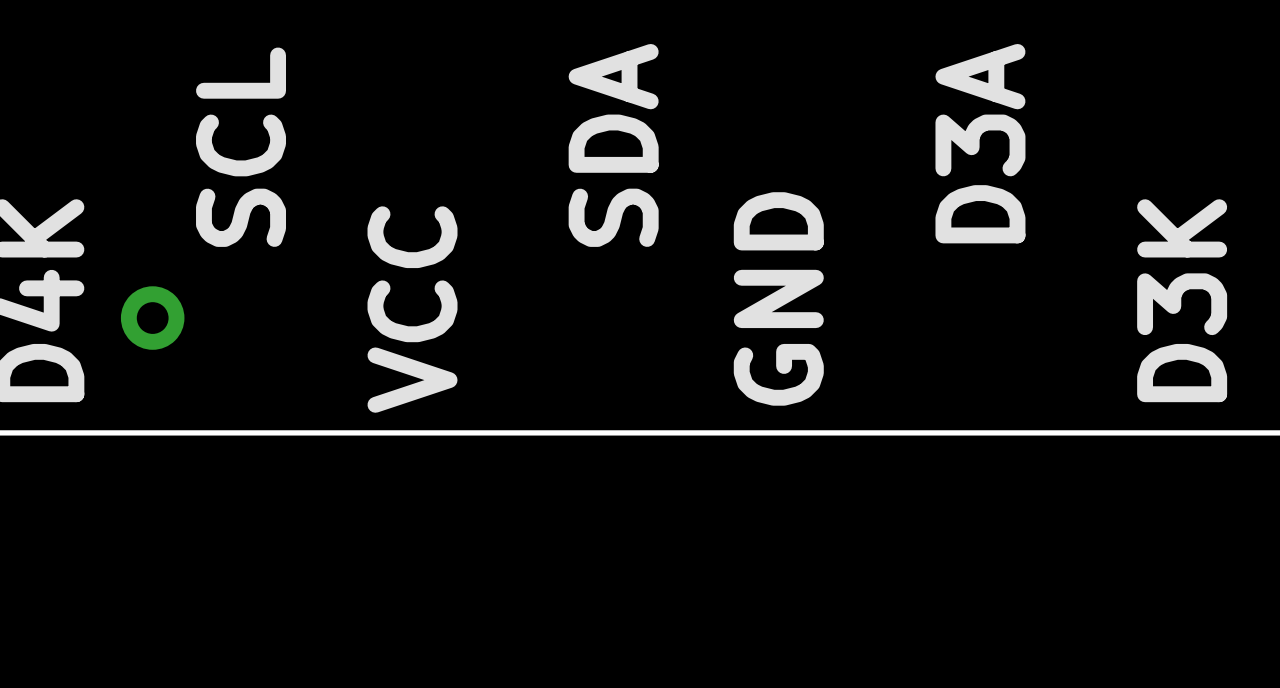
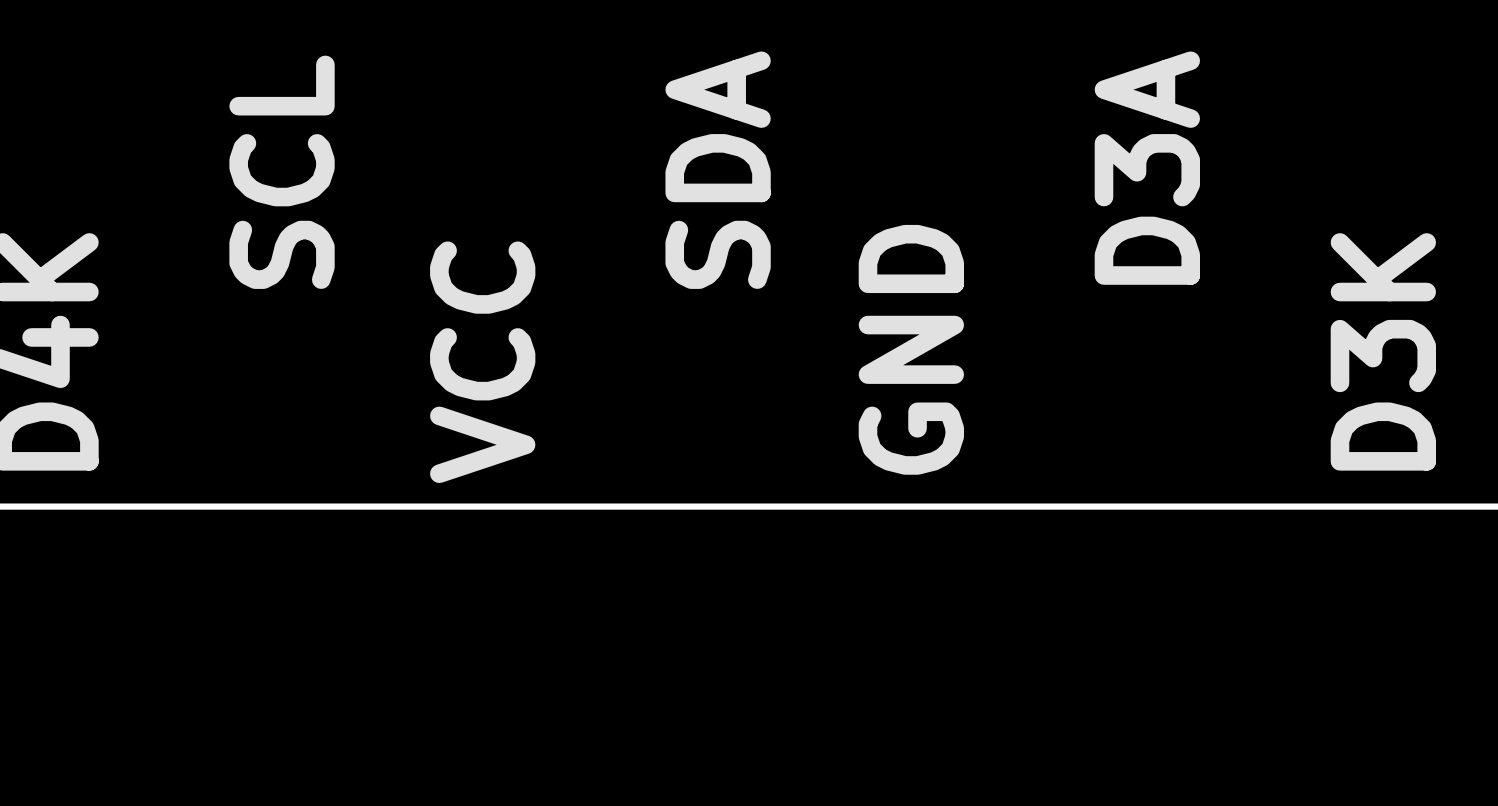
via: (152, 318) -> none

